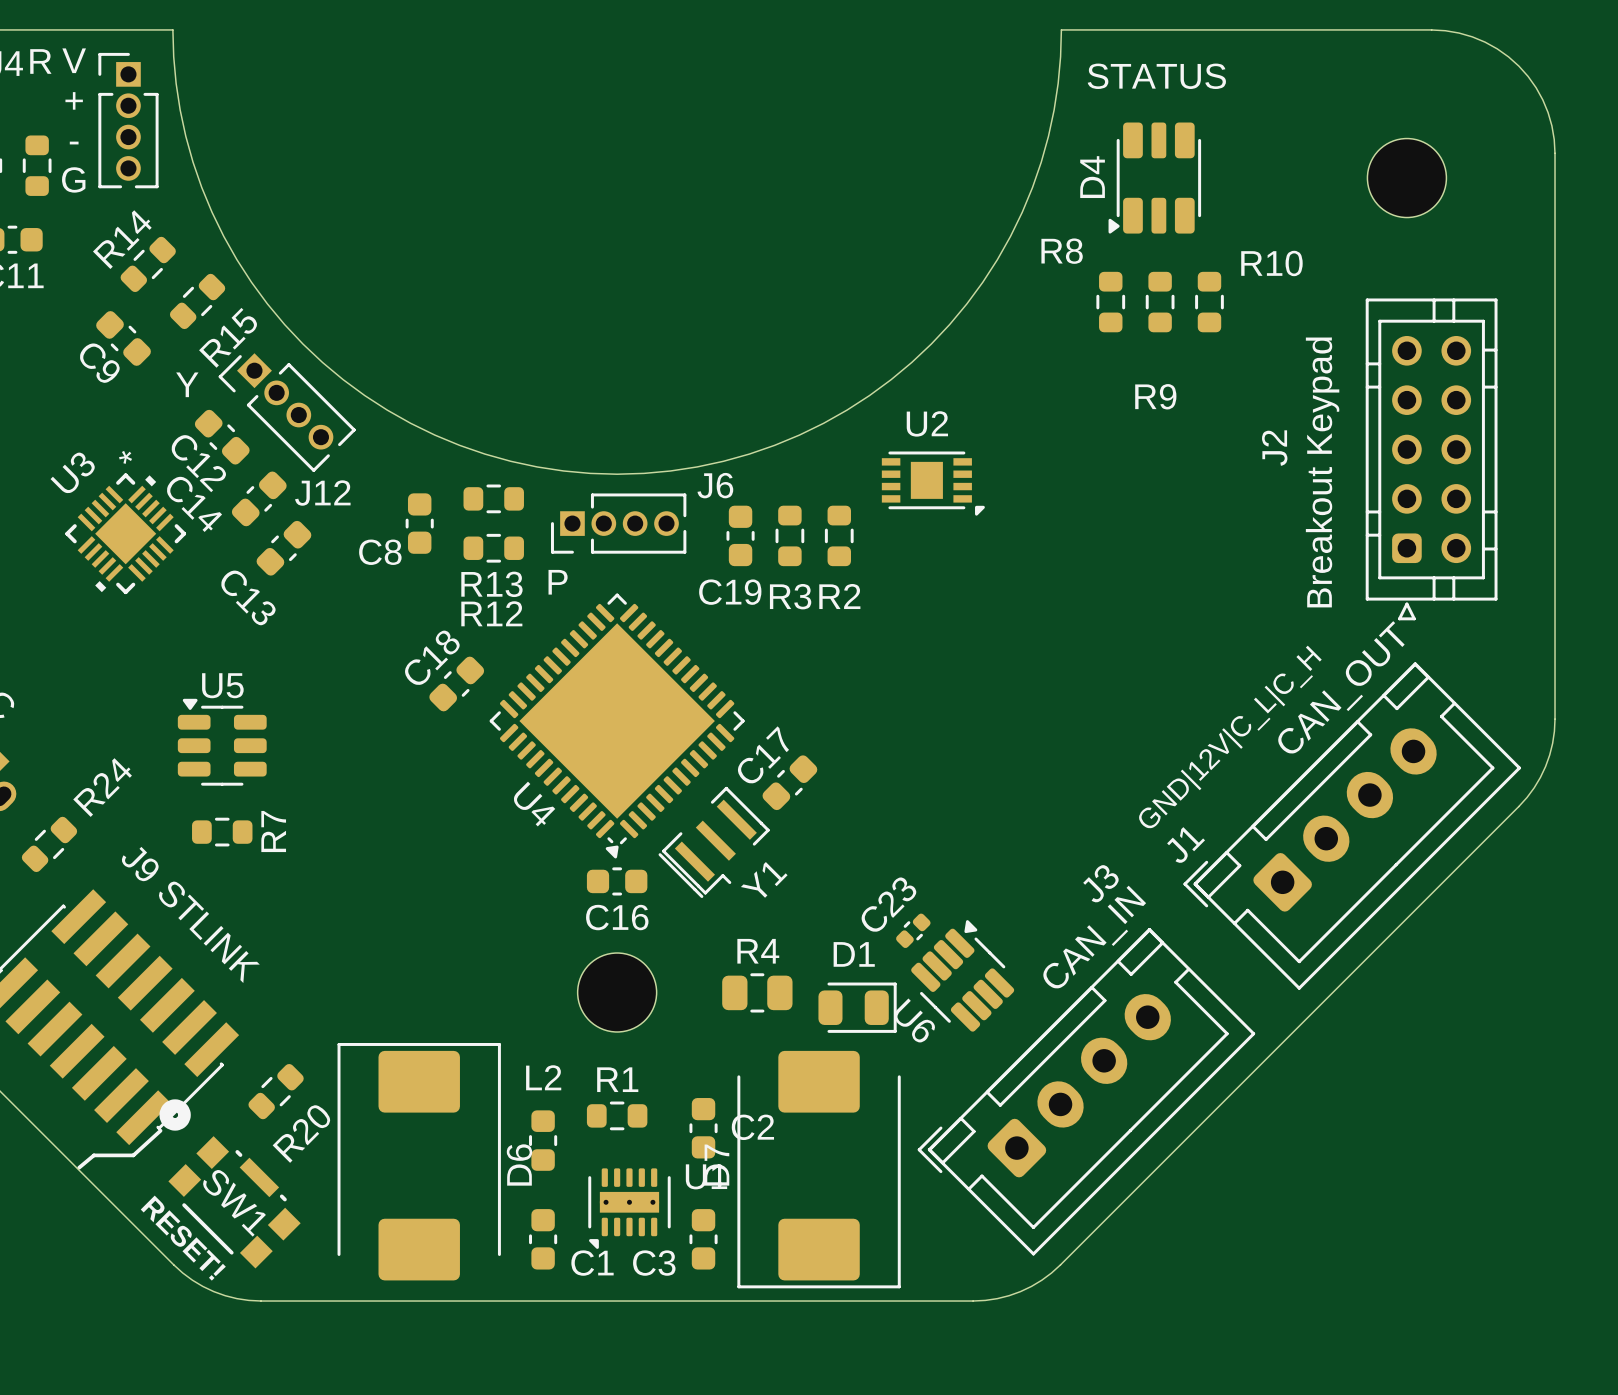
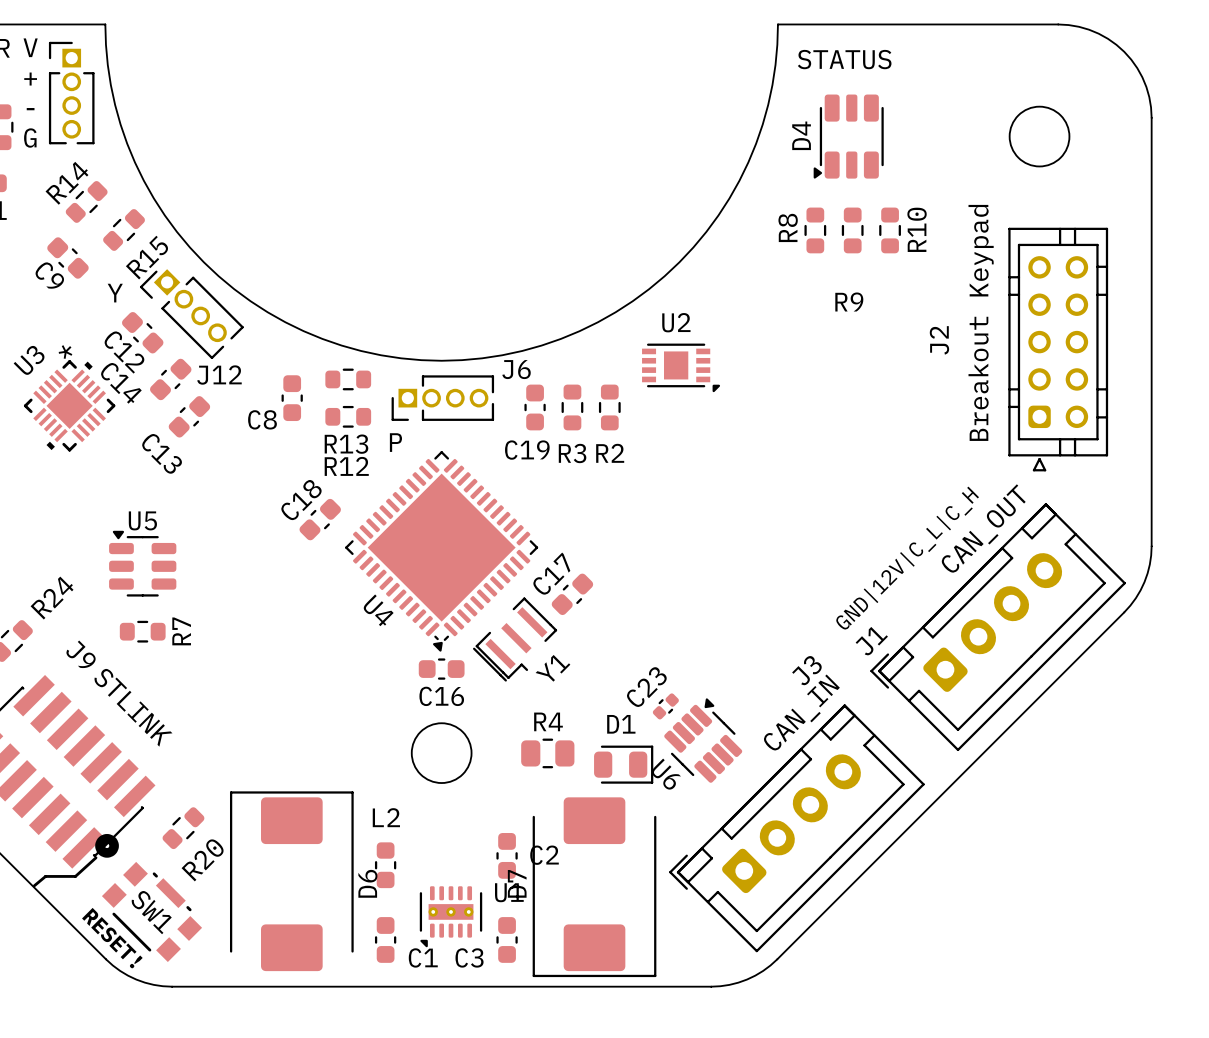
R8 name rotation: 0° (1062, 251) -> 90° counterclockwise (788, 227)
R10 name rotation: 0° (1271, 263) -> 90° counterclockwise (917, 229)
text position: Breakout Keypad (1322, 472) -> Breakout Keypad (981, 322)
R1: (617, 1115) -> none

